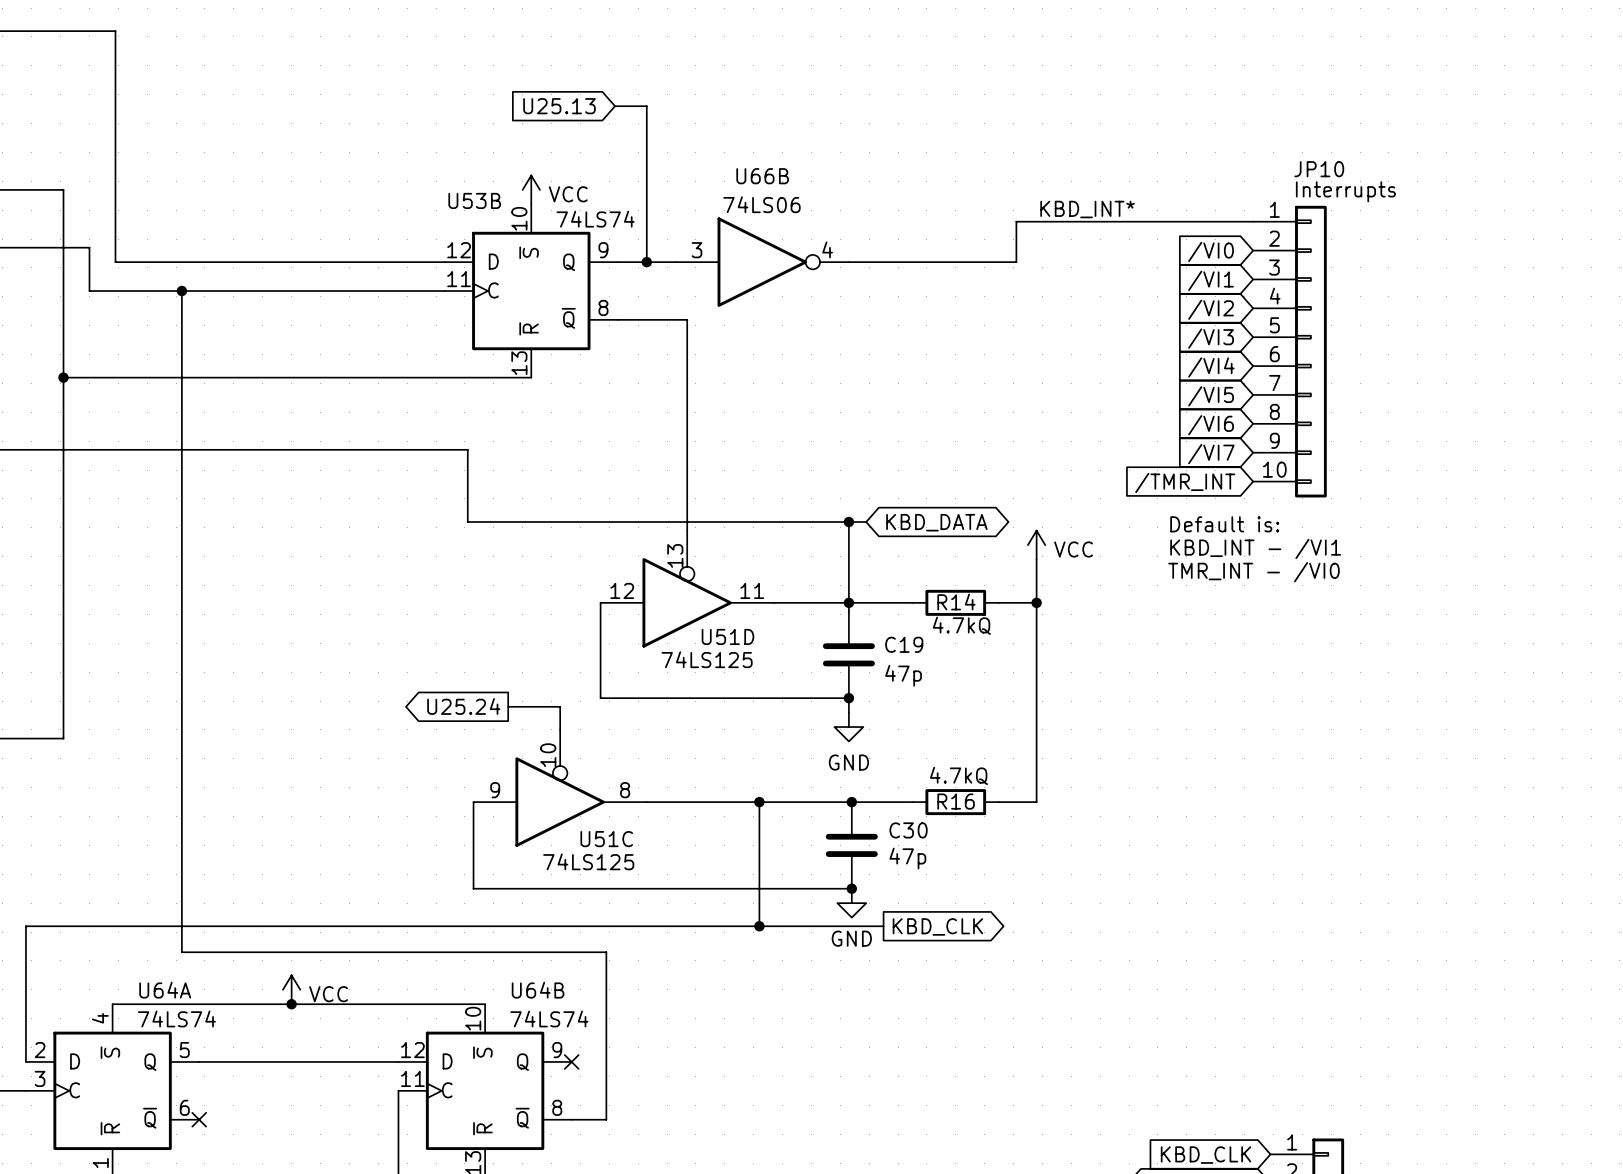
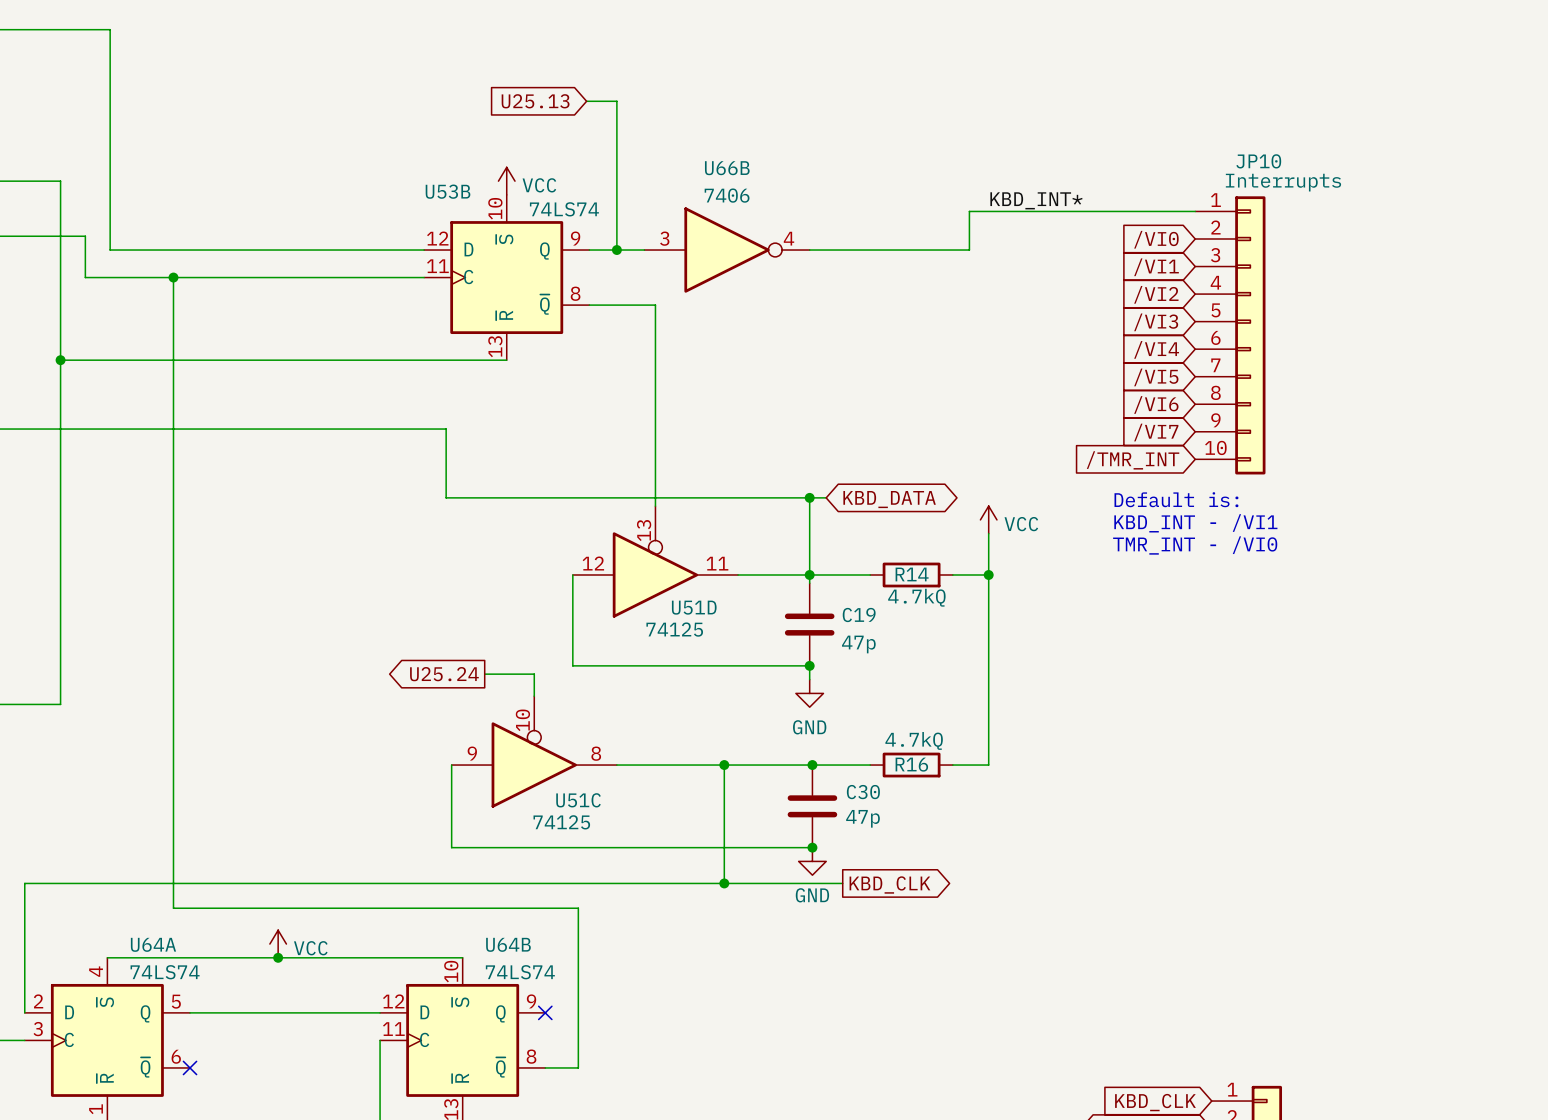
U66B value: 74LS06 (761, 204) -> 7406 (727, 195)
U51D value: 74LS125 (707, 659) -> 74125 (674, 629)
U51C value: 74LS125 (588, 861) -> 74125 (561, 822)

